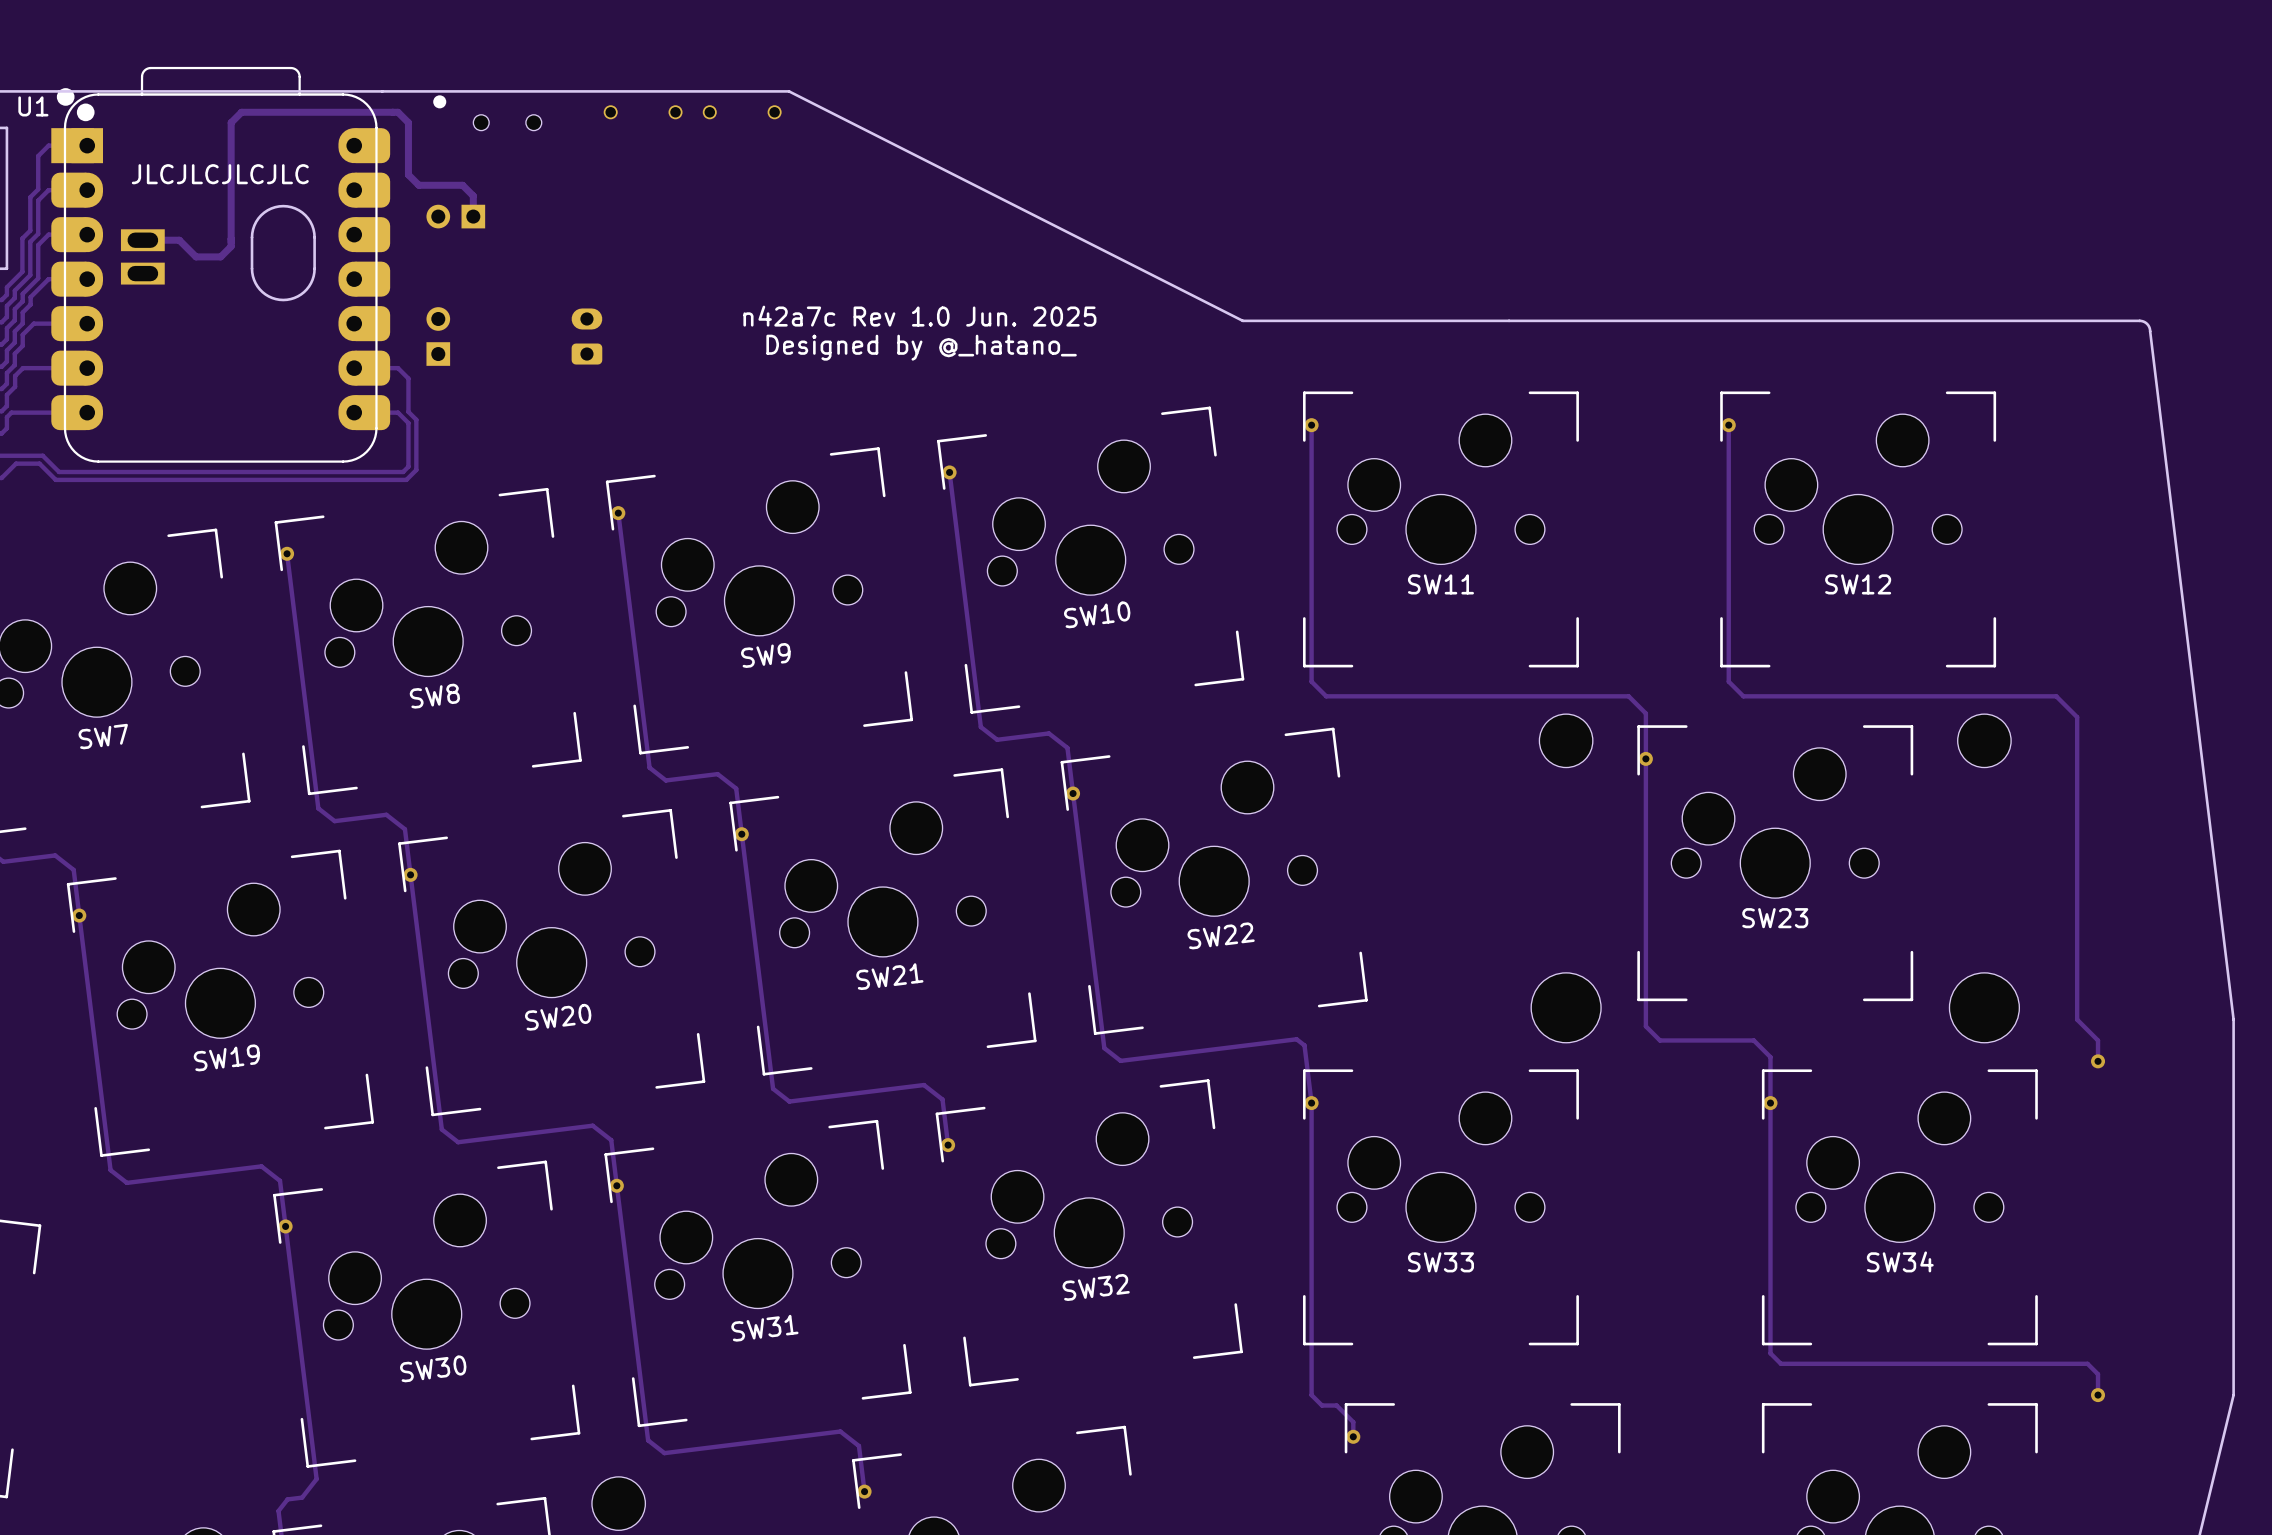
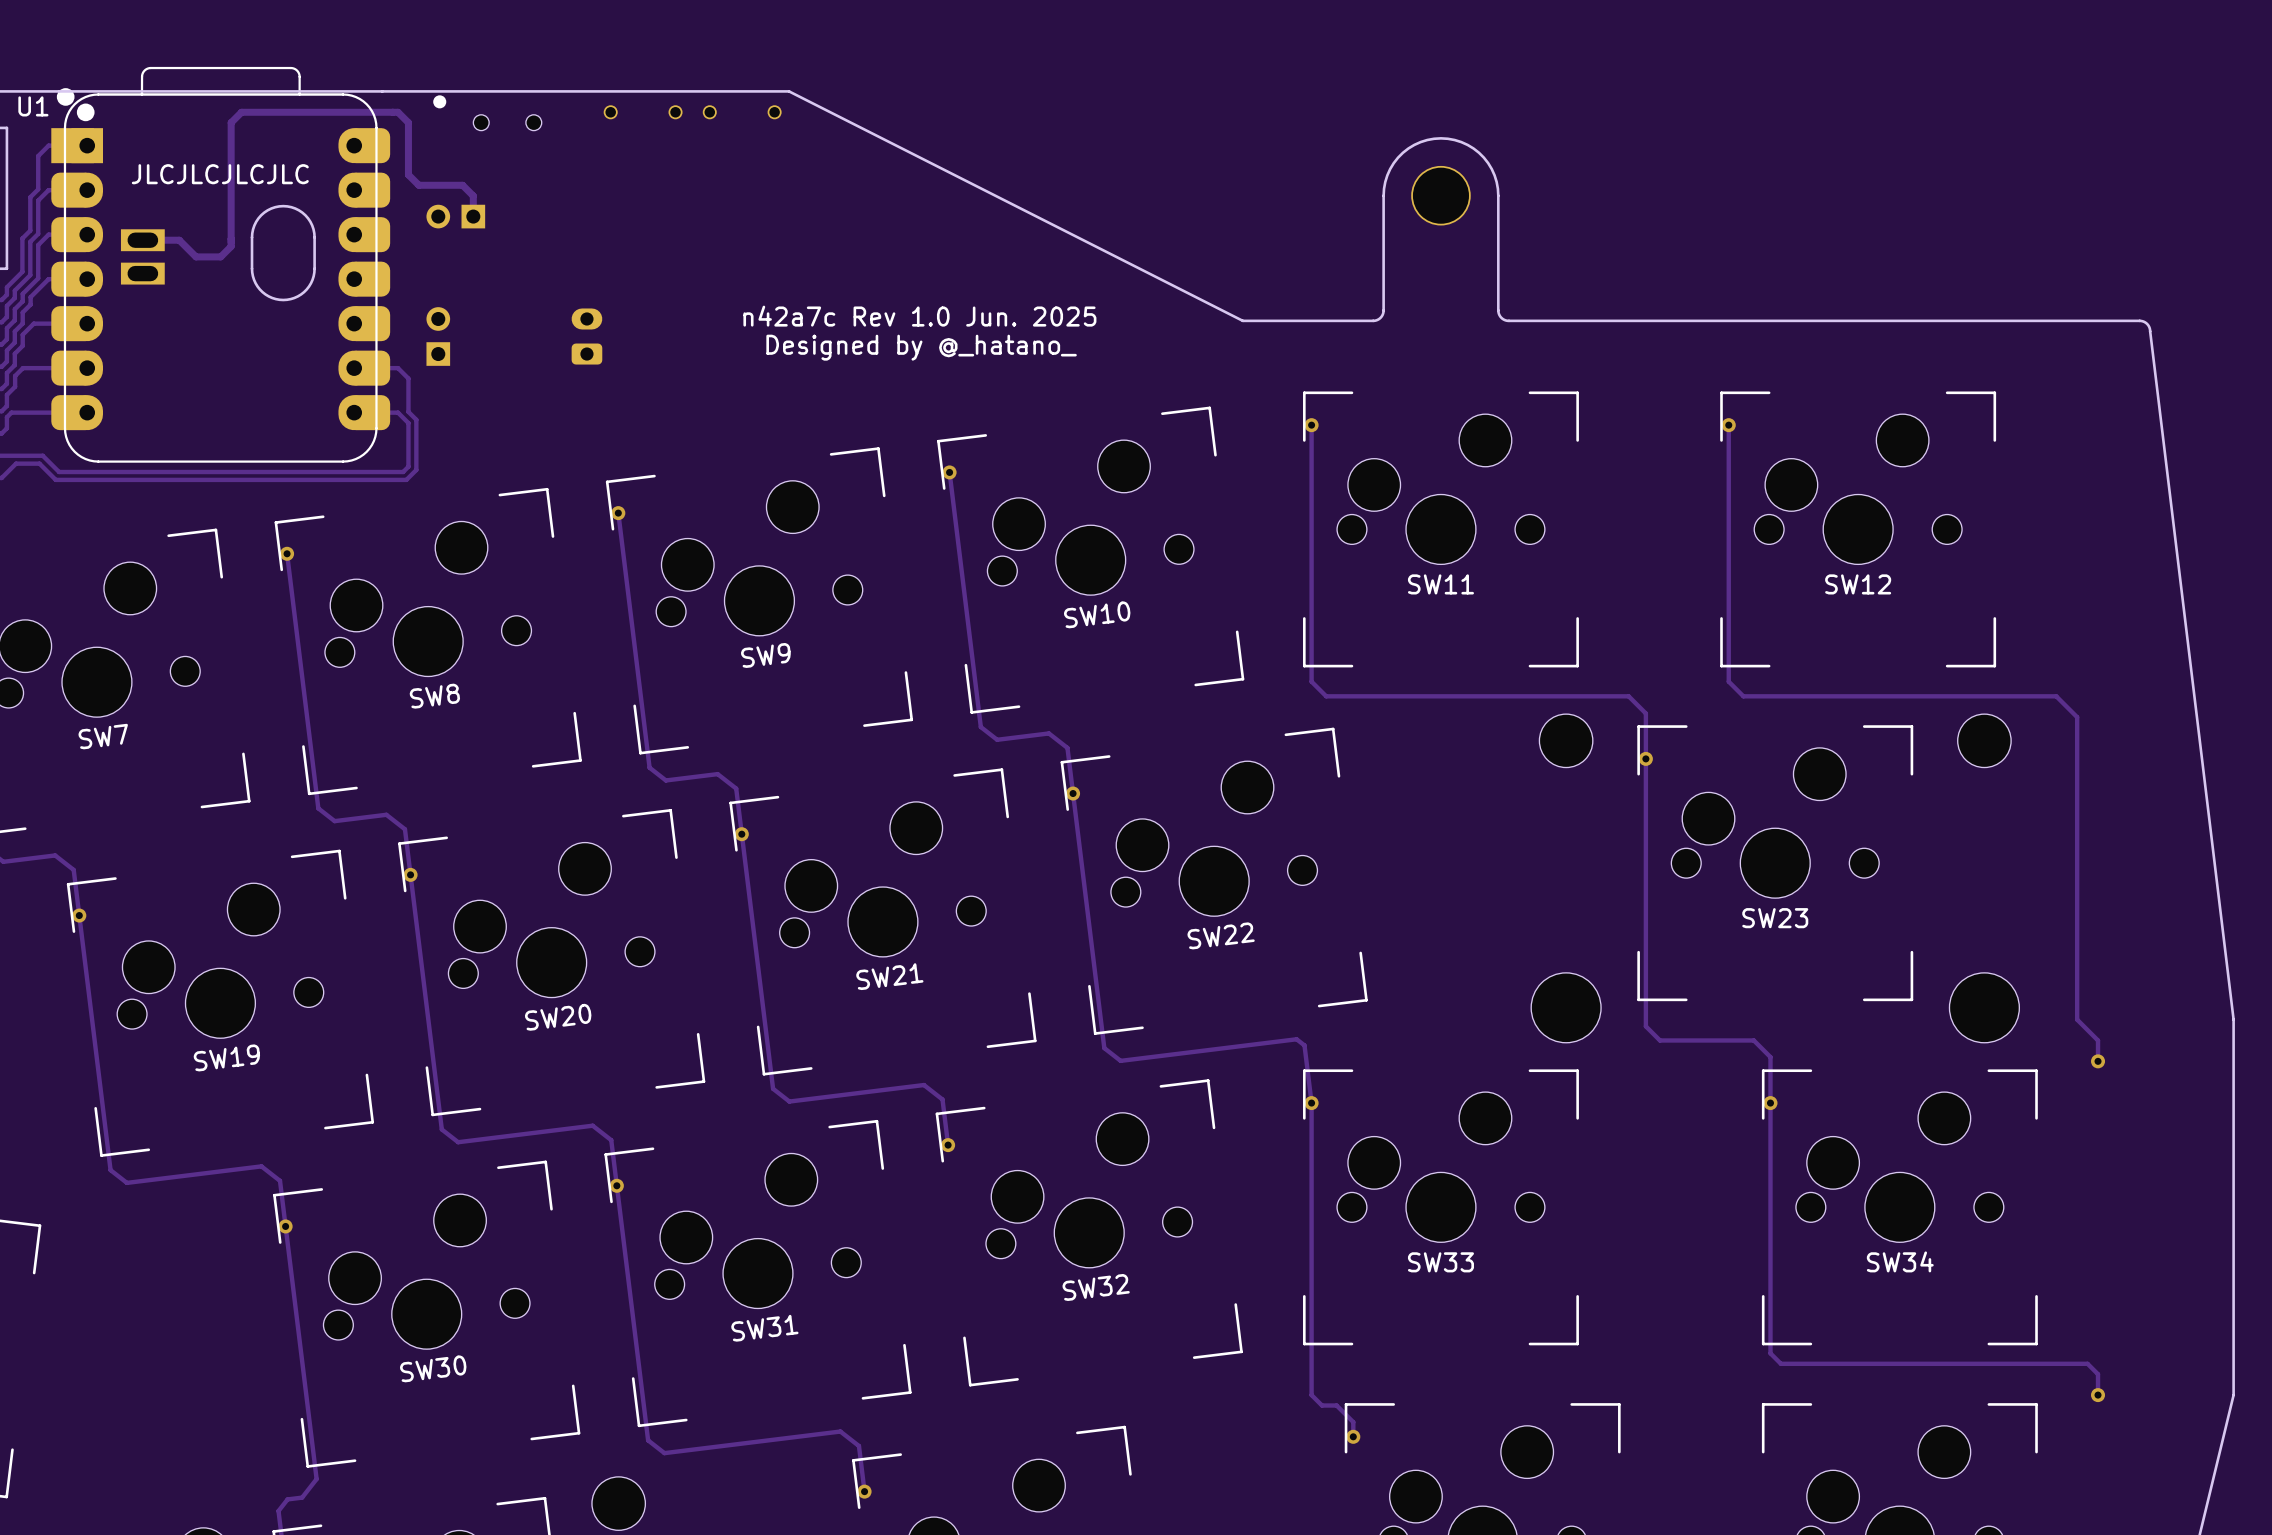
part: none -> (1440, 195)
board edge: (1373, 320) (1509, 320) -> (1373, 320) (1380, 317) (1383, 311) (1383, 195) (1387, 175) (1398, 157) (1408, 148) (1420, 142) (1440, 138) (1461, 142) (1473, 148) (1488, 163) (1494, 175) (1498, 195) (1498, 311) (1501, 317) (1508, 320)

